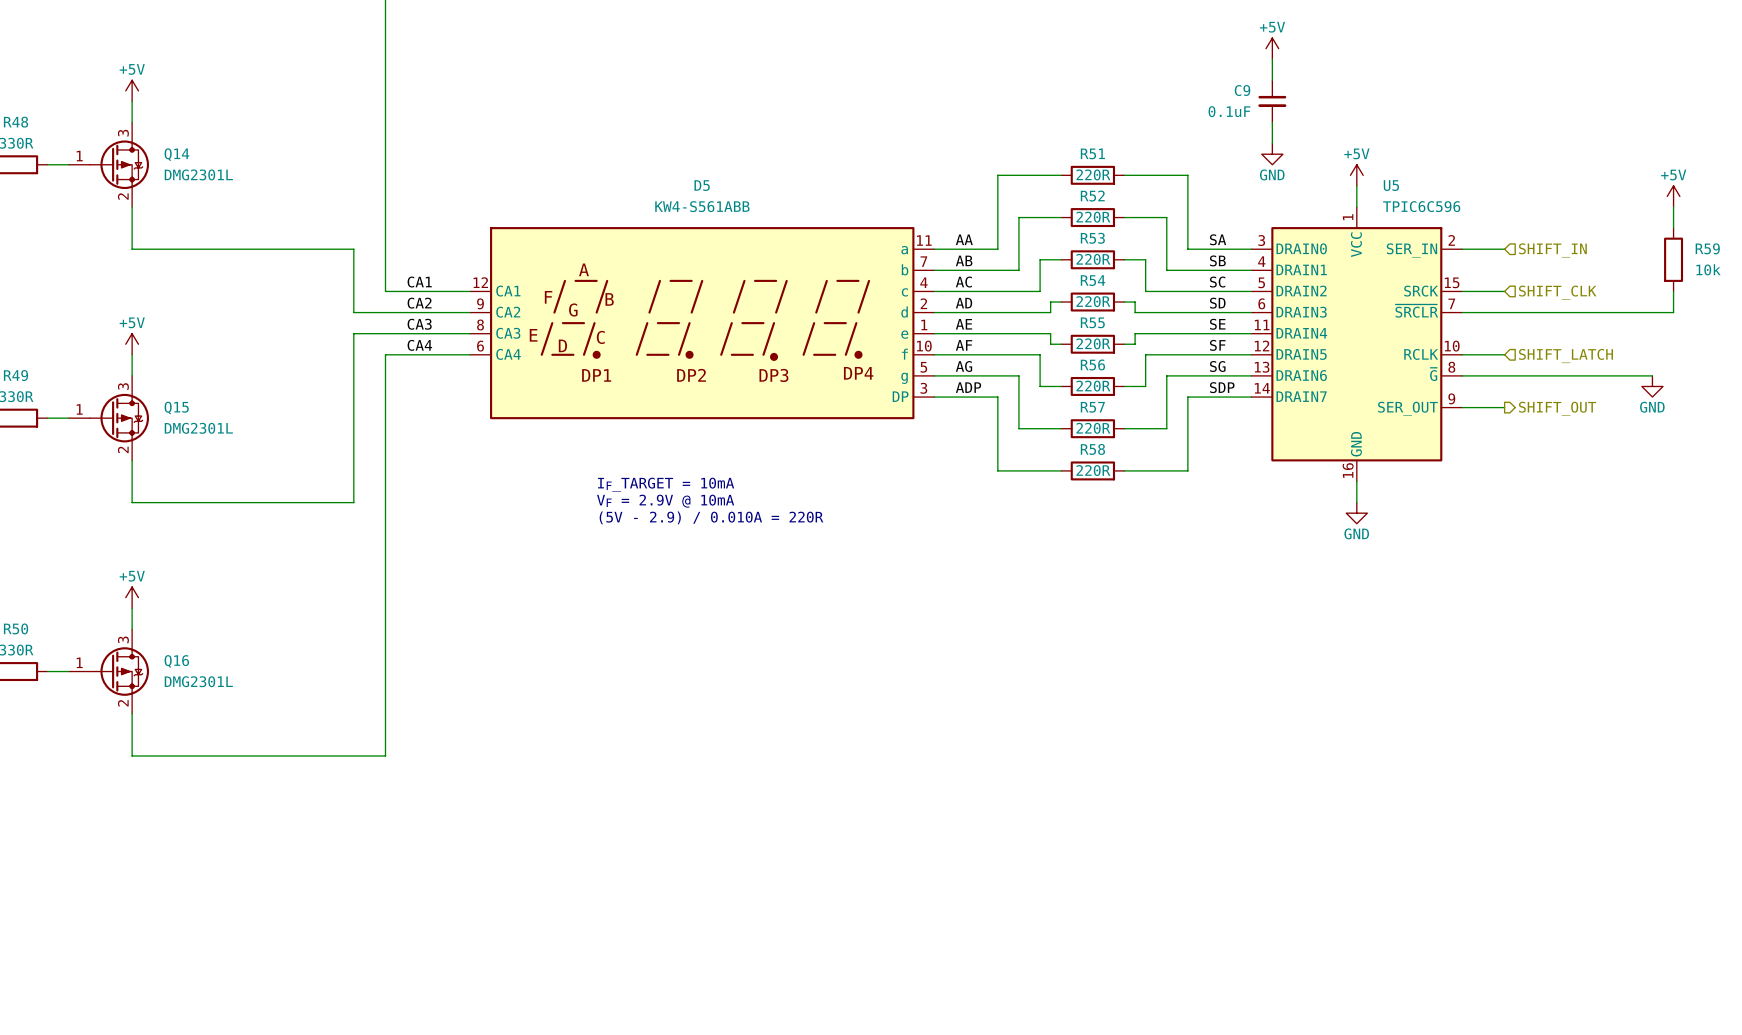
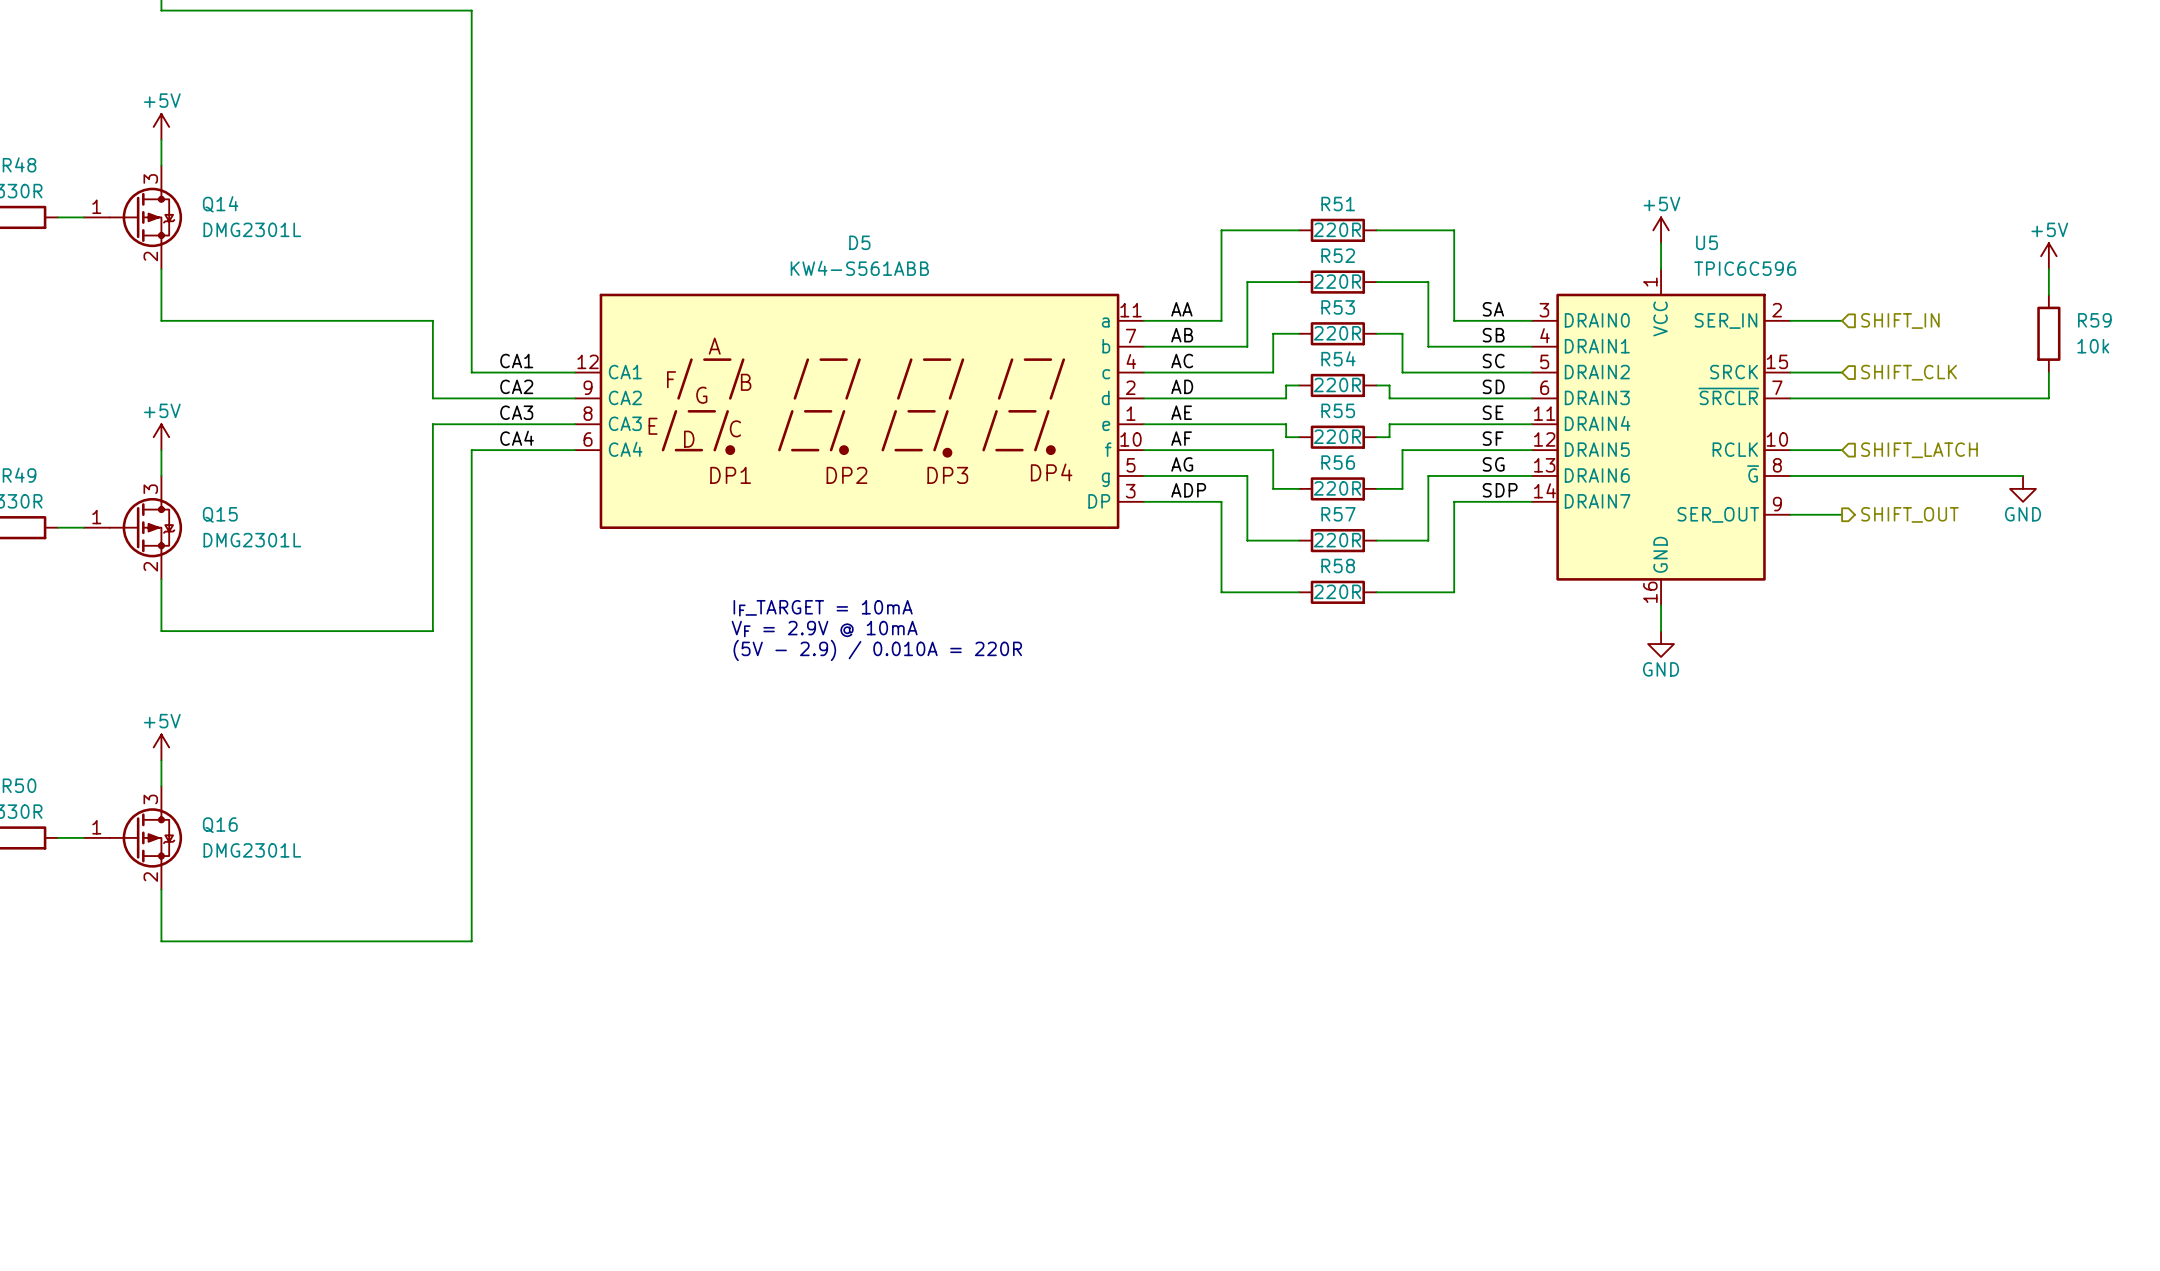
power symbol: +5V (1272, 48) -> none
wire: (1272, 59) (1272, 80) -> none
C9: 0.1uF (1272, 101) -> none
wire: (1272, 122) (1272, 143) -> none
power symbol: GND (1272, 154) -> none

